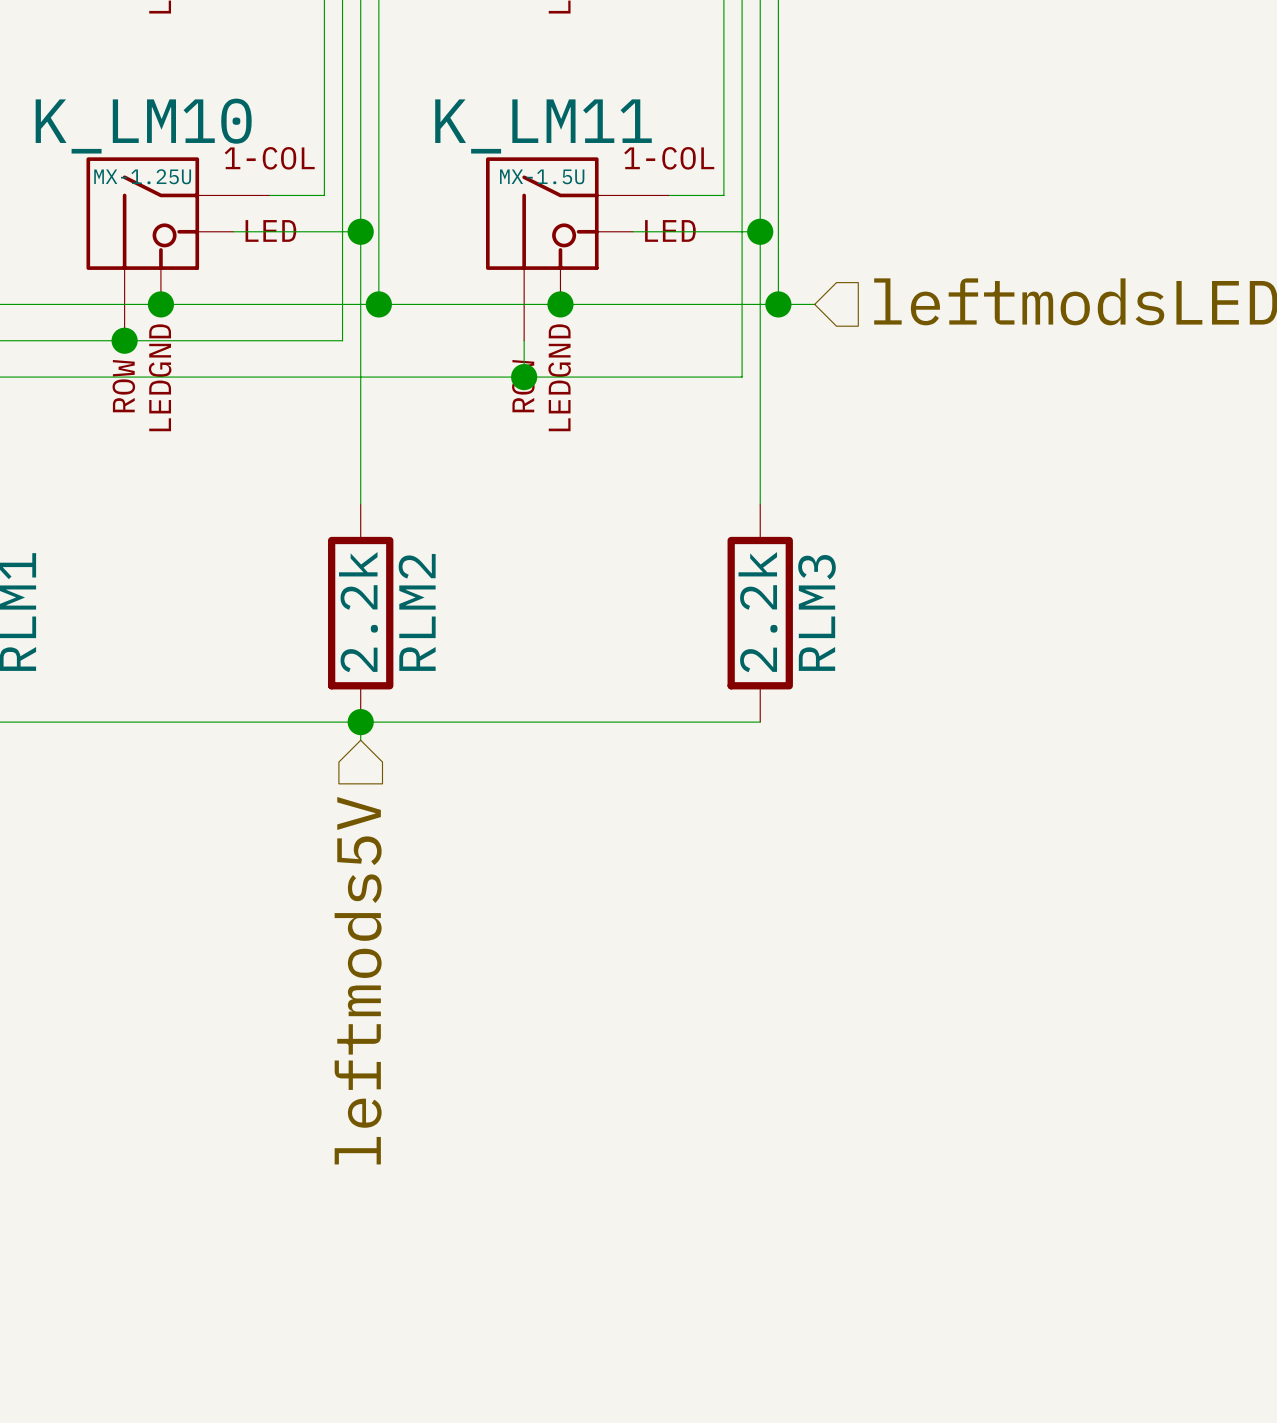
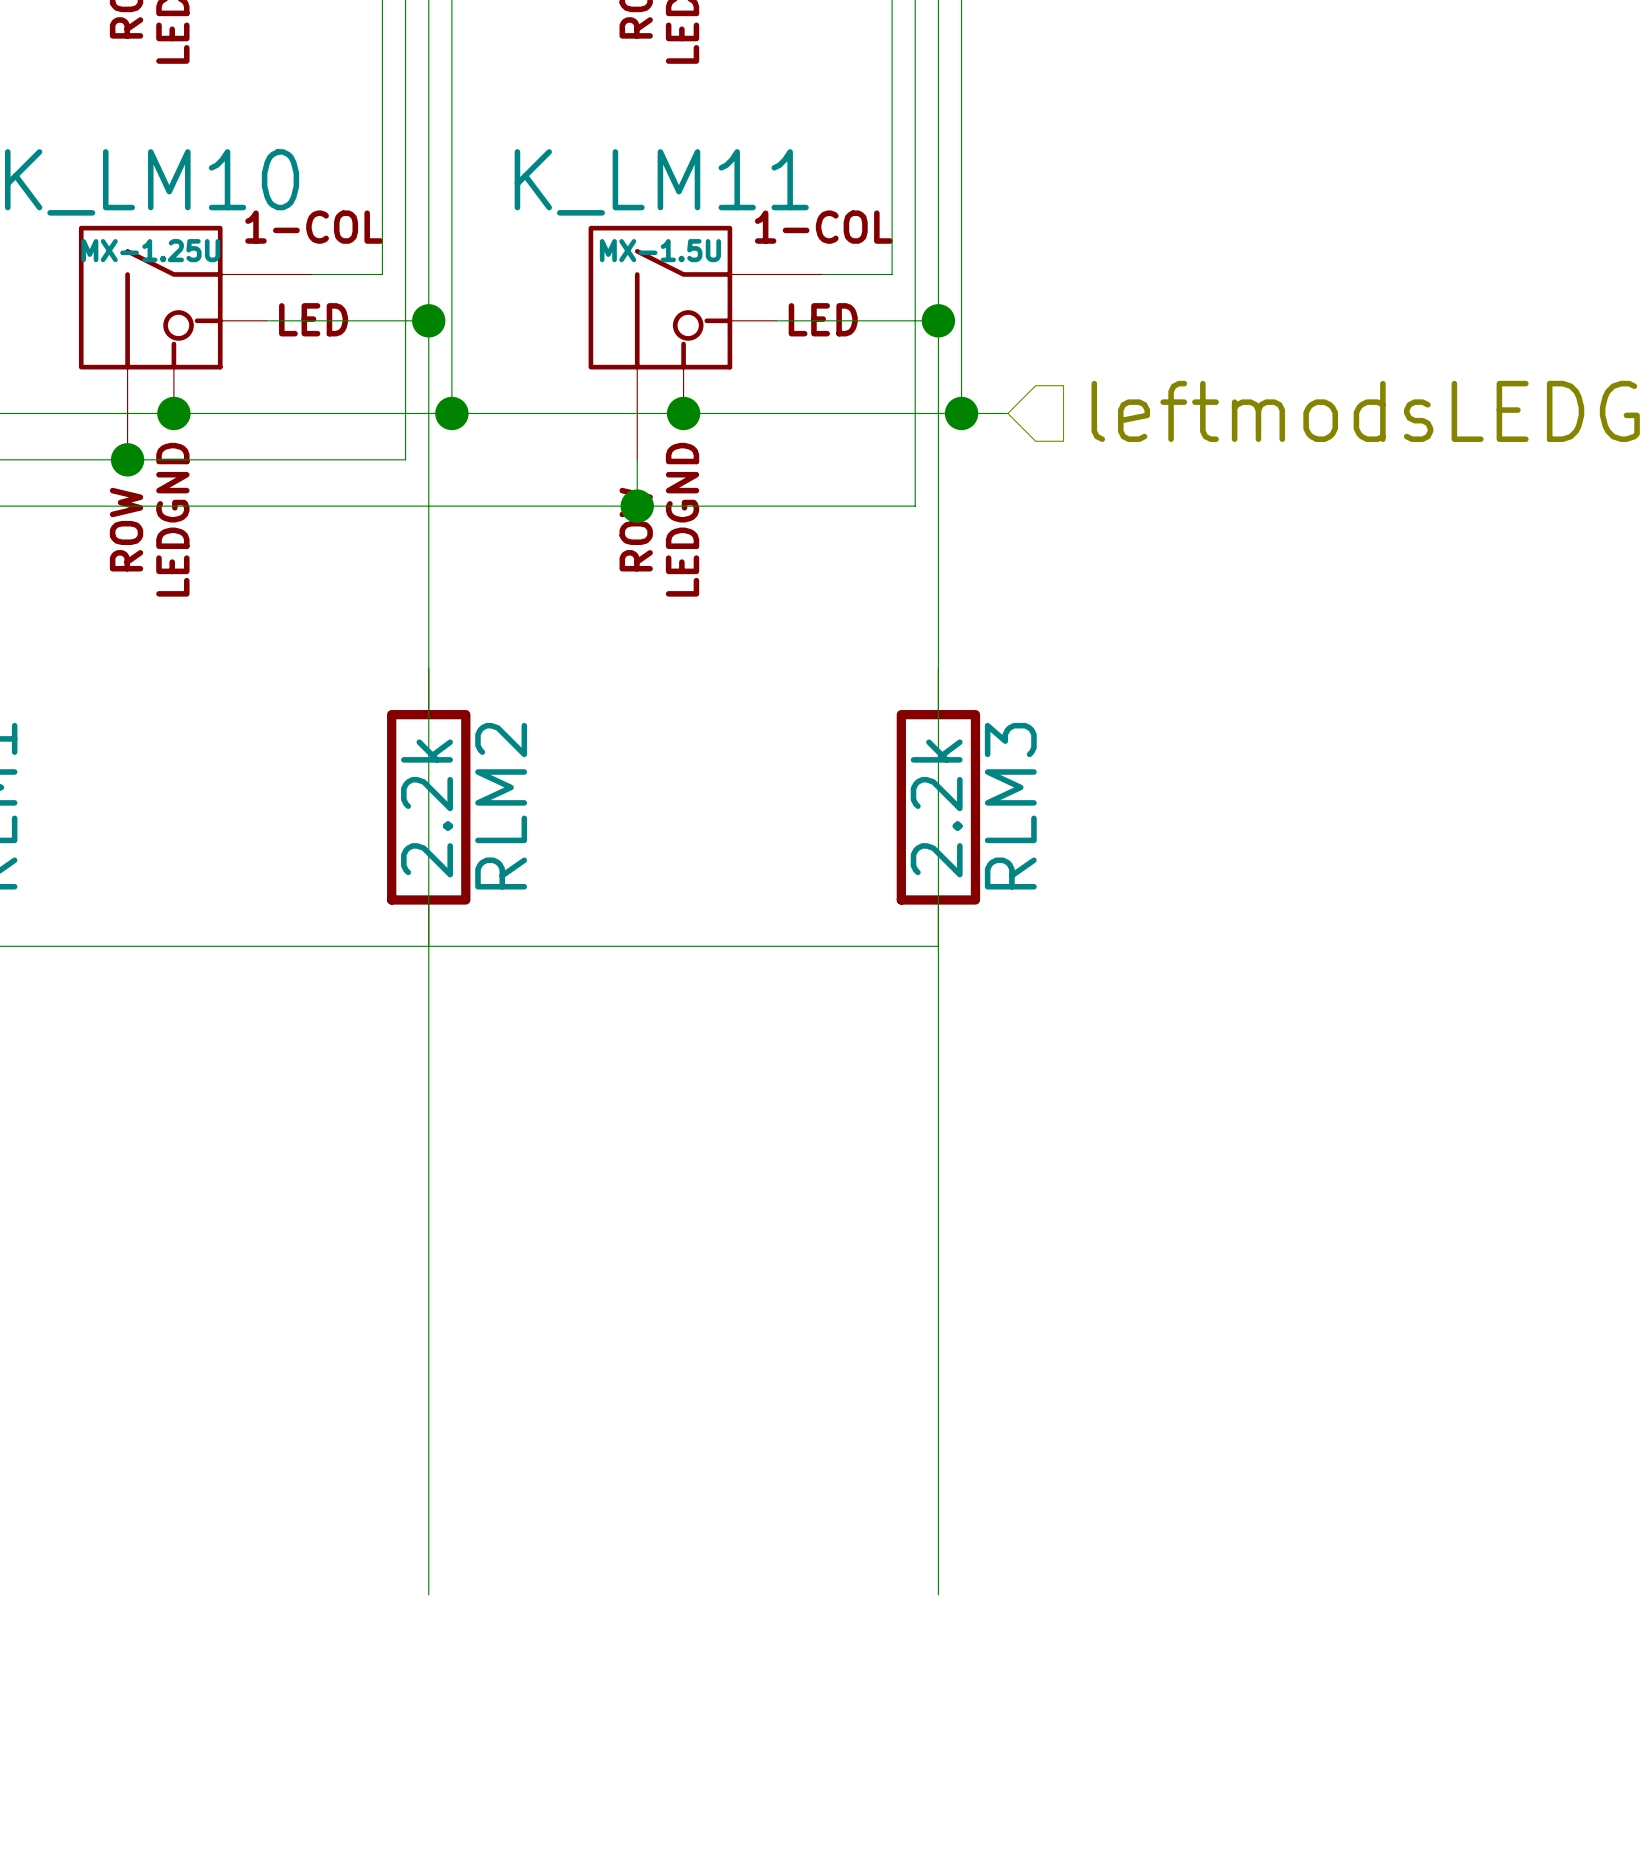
wire: none -> (428, 668) (428, 946)
wire: none -> (938, 668) (938, 1594)
junction: (360, 722) -> none
wire: none -> (428, 969) (428, 1594)
hierarchical label: leftmods5V (358, 980) -> none

